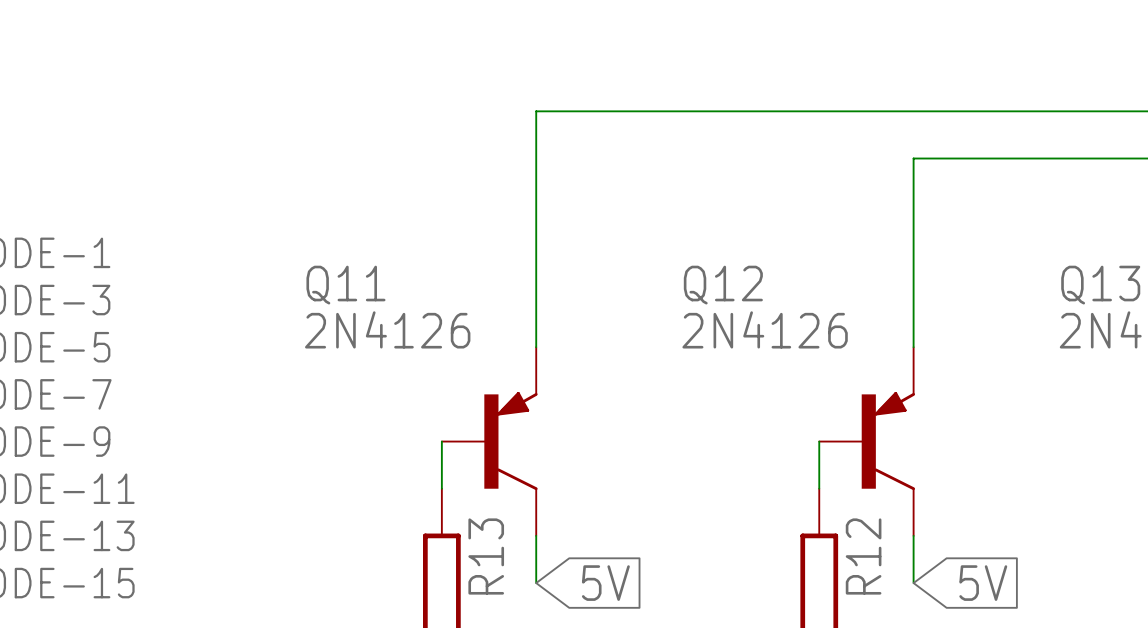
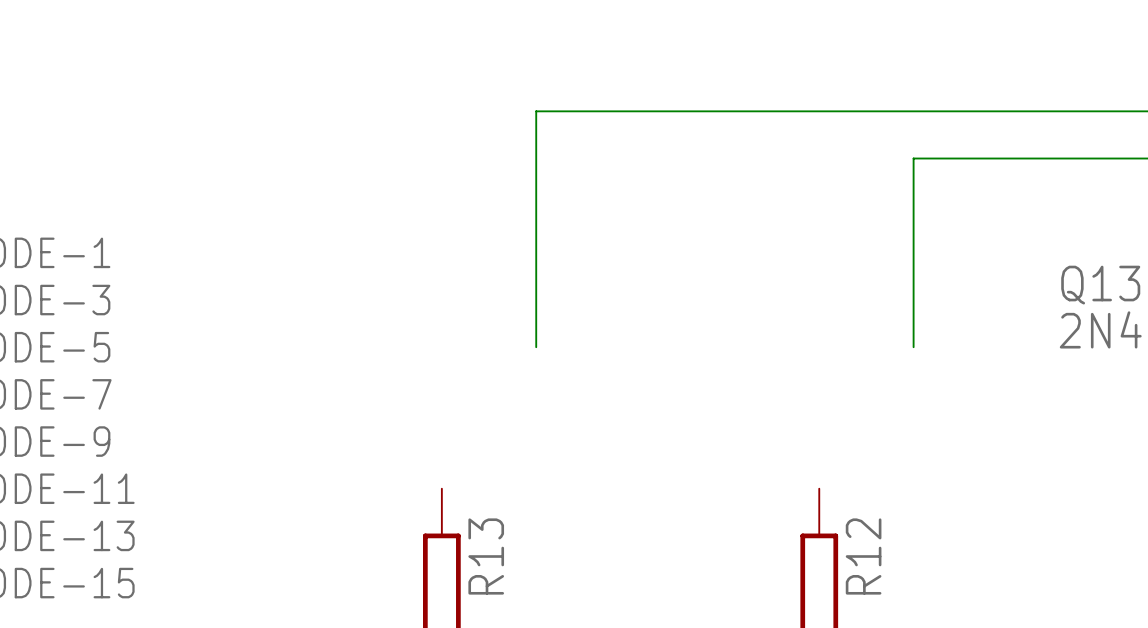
wire: (441, 441) (441, 488) -> none
Q11: 2N4126 (489, 441) -> none
wire: (819, 441) (819, 488) -> none
Q12: 2N4126 (867, 441) -> none
wire: (536, 535) (536, 583) -> none
wire: (913, 535) (913, 583) -> none
global label: 5V (605, 583) -> none
global label: 5V (983, 583) -> none

